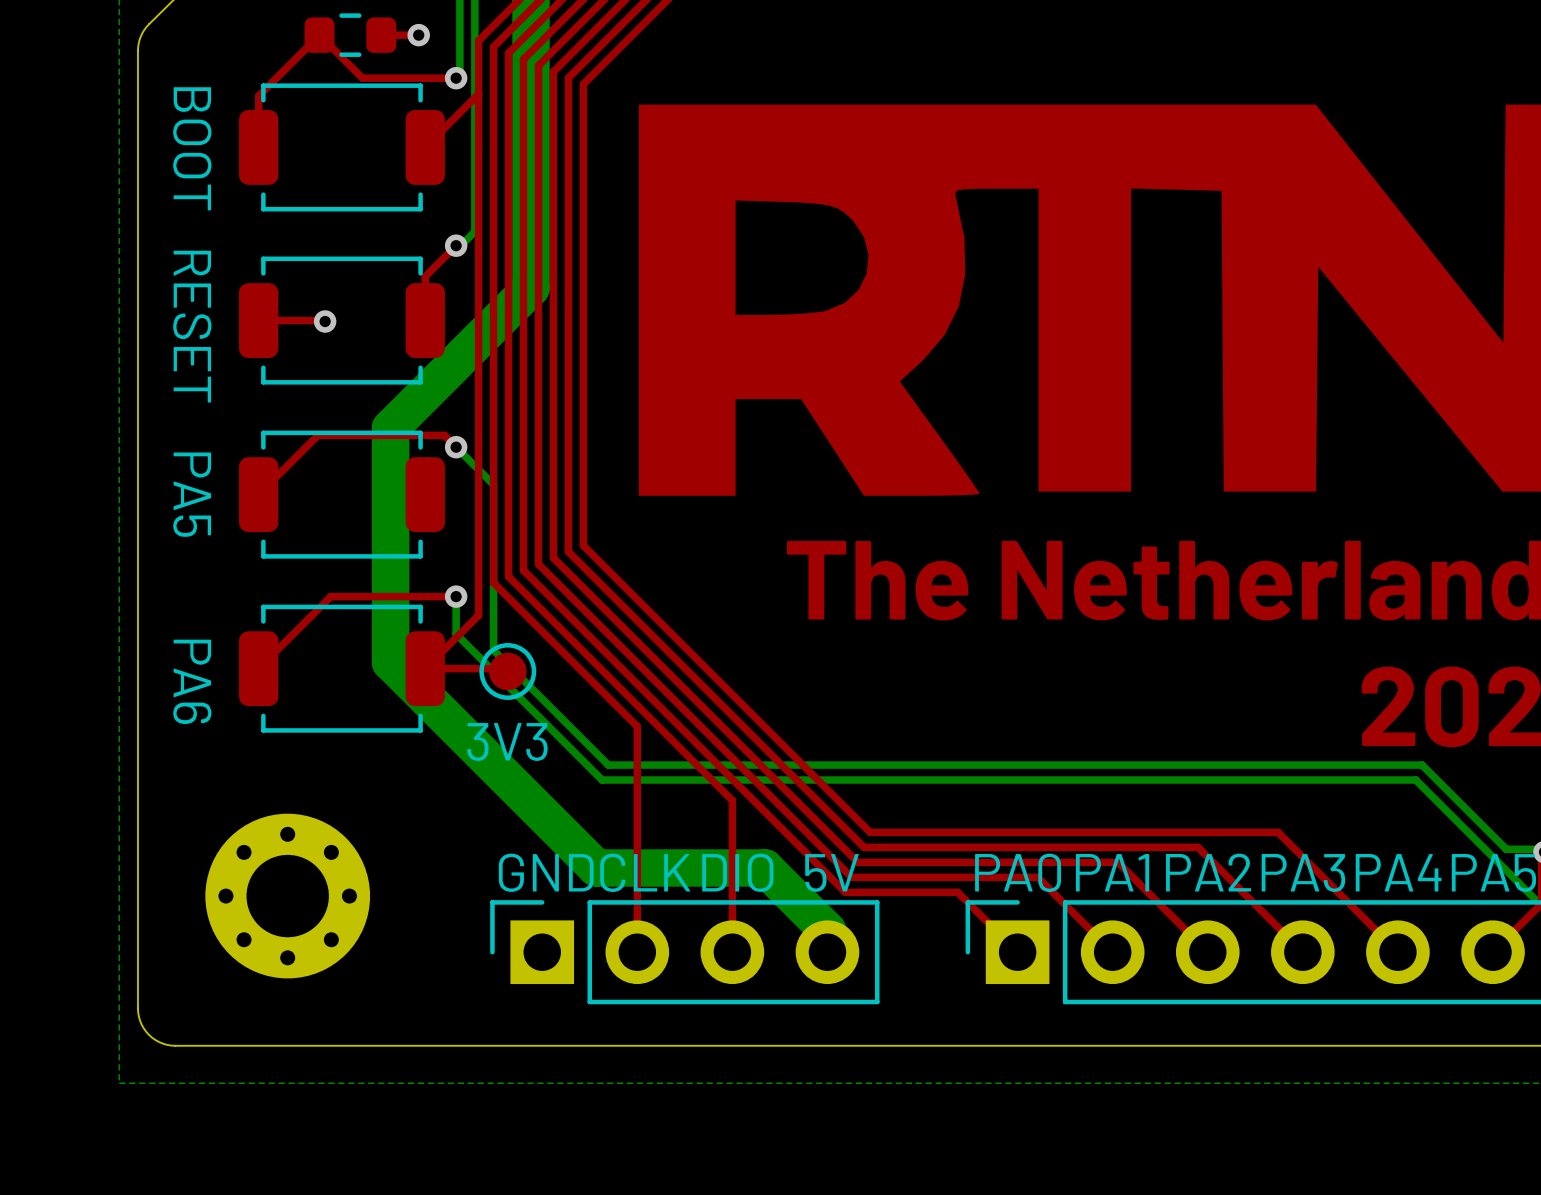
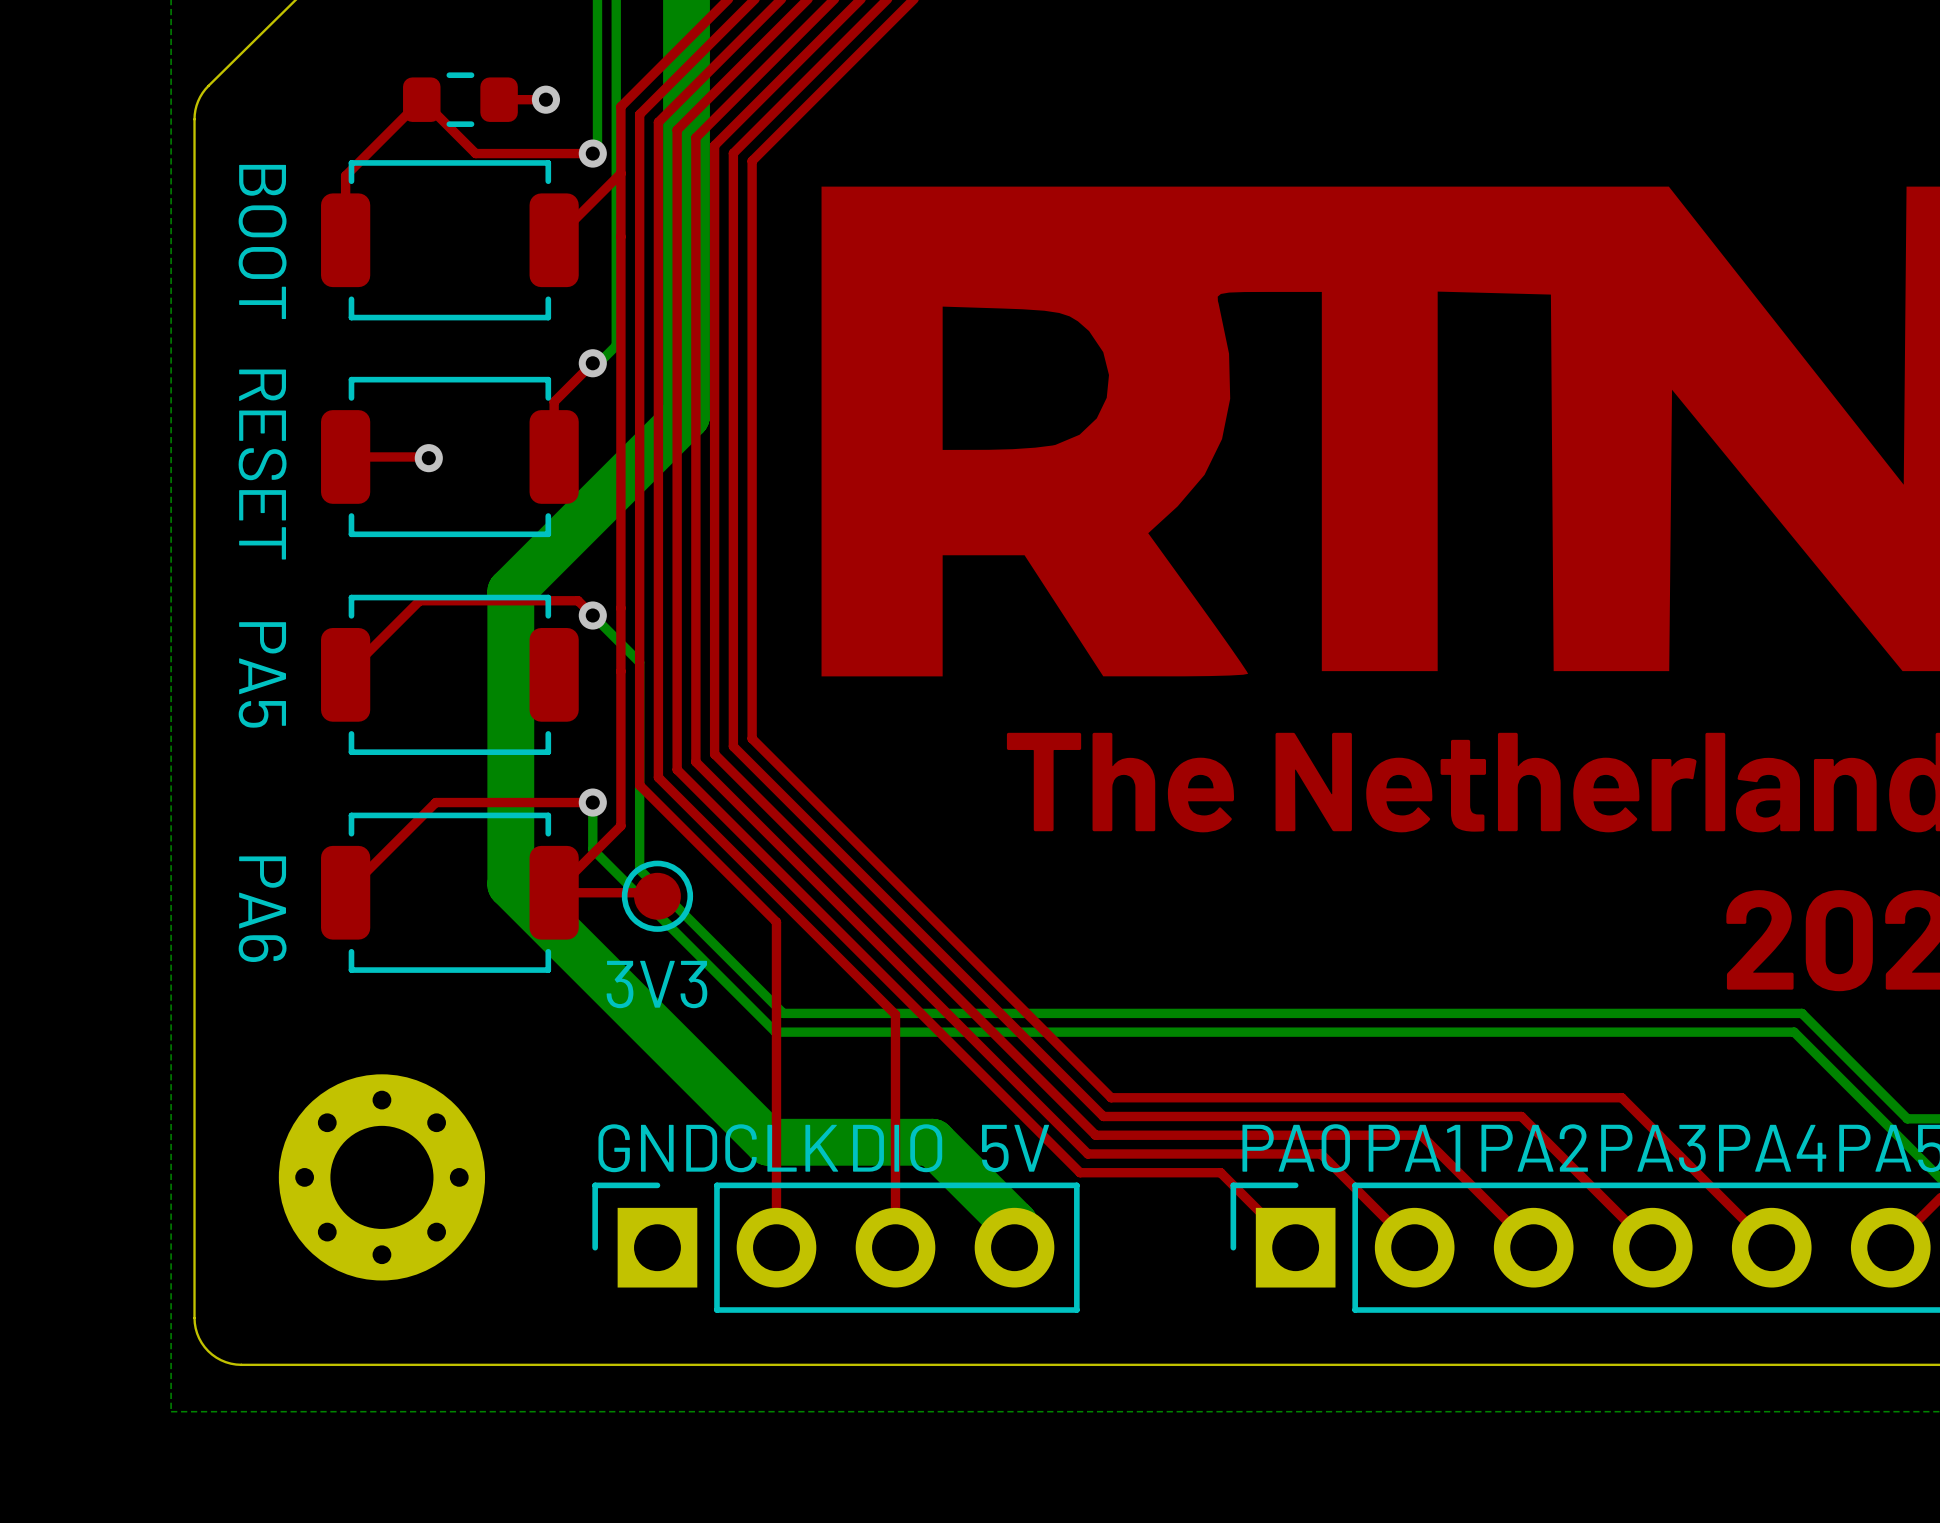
top track: (602, 692) (637, 726) (637, 952) -> (776, 922) (776, 1247)
top track: (697, 766) (732, 800) (732, 952) -> (895, 1014) (895, 1247)
bottom track: (727, 868) (764, 868) (827, 930) (827, 952) -> (932, 1142) (1014, 1224) (1014, 1247)
text position: GND (546, 872) -> GND (657, 1148)
text position: CLK (645, 872) -> CLK (781, 1148)
text position: DIO (737, 872) -> DIO (897, 1148)
text position: 5V (832, 872) -> 5V (1015, 1148)
part position: (684, 952) -> (835, 1247)

